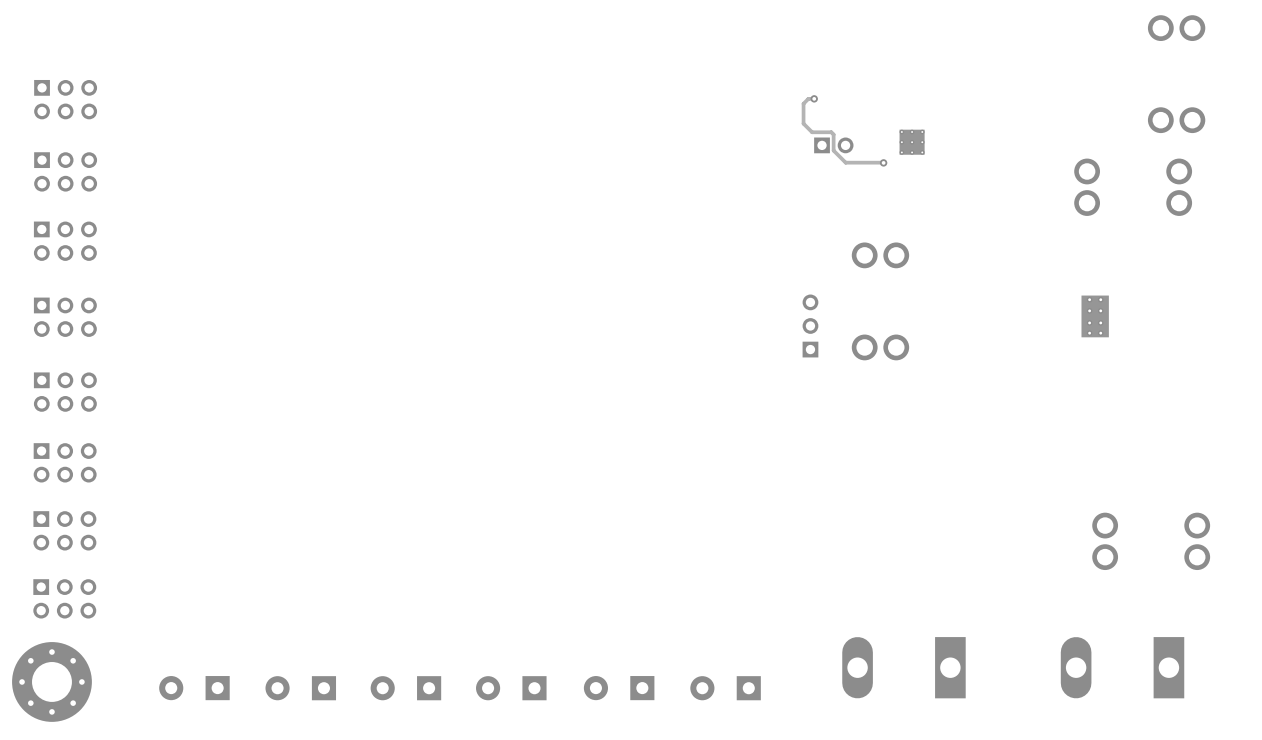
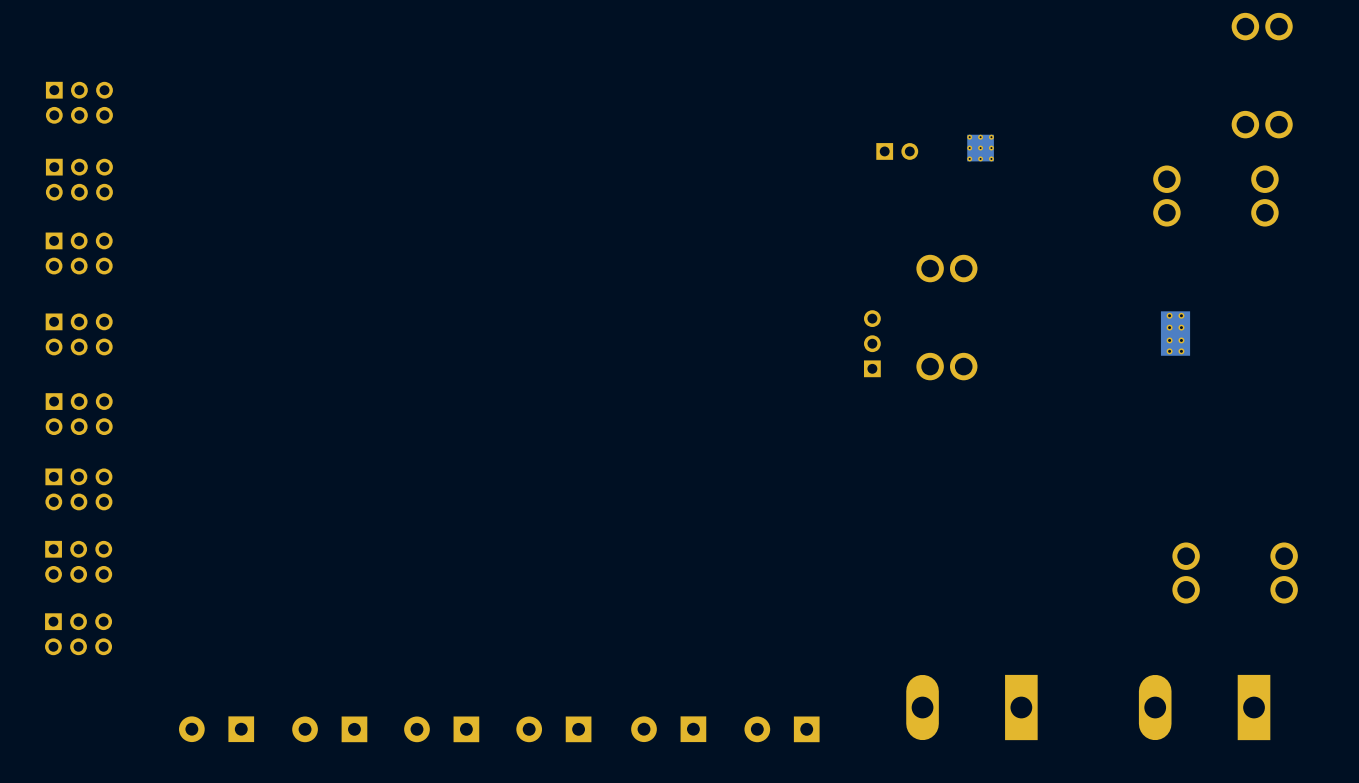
track: (814, 98) (808, 98) (803, 103) (803, 123) (812, 132) (831, 132) (833, 134) (833, 150) (845, 162) (883, 162) -> none
via: (814, 98) -> none
via: (883, 162) -> none
part: (51, 681) -> none

